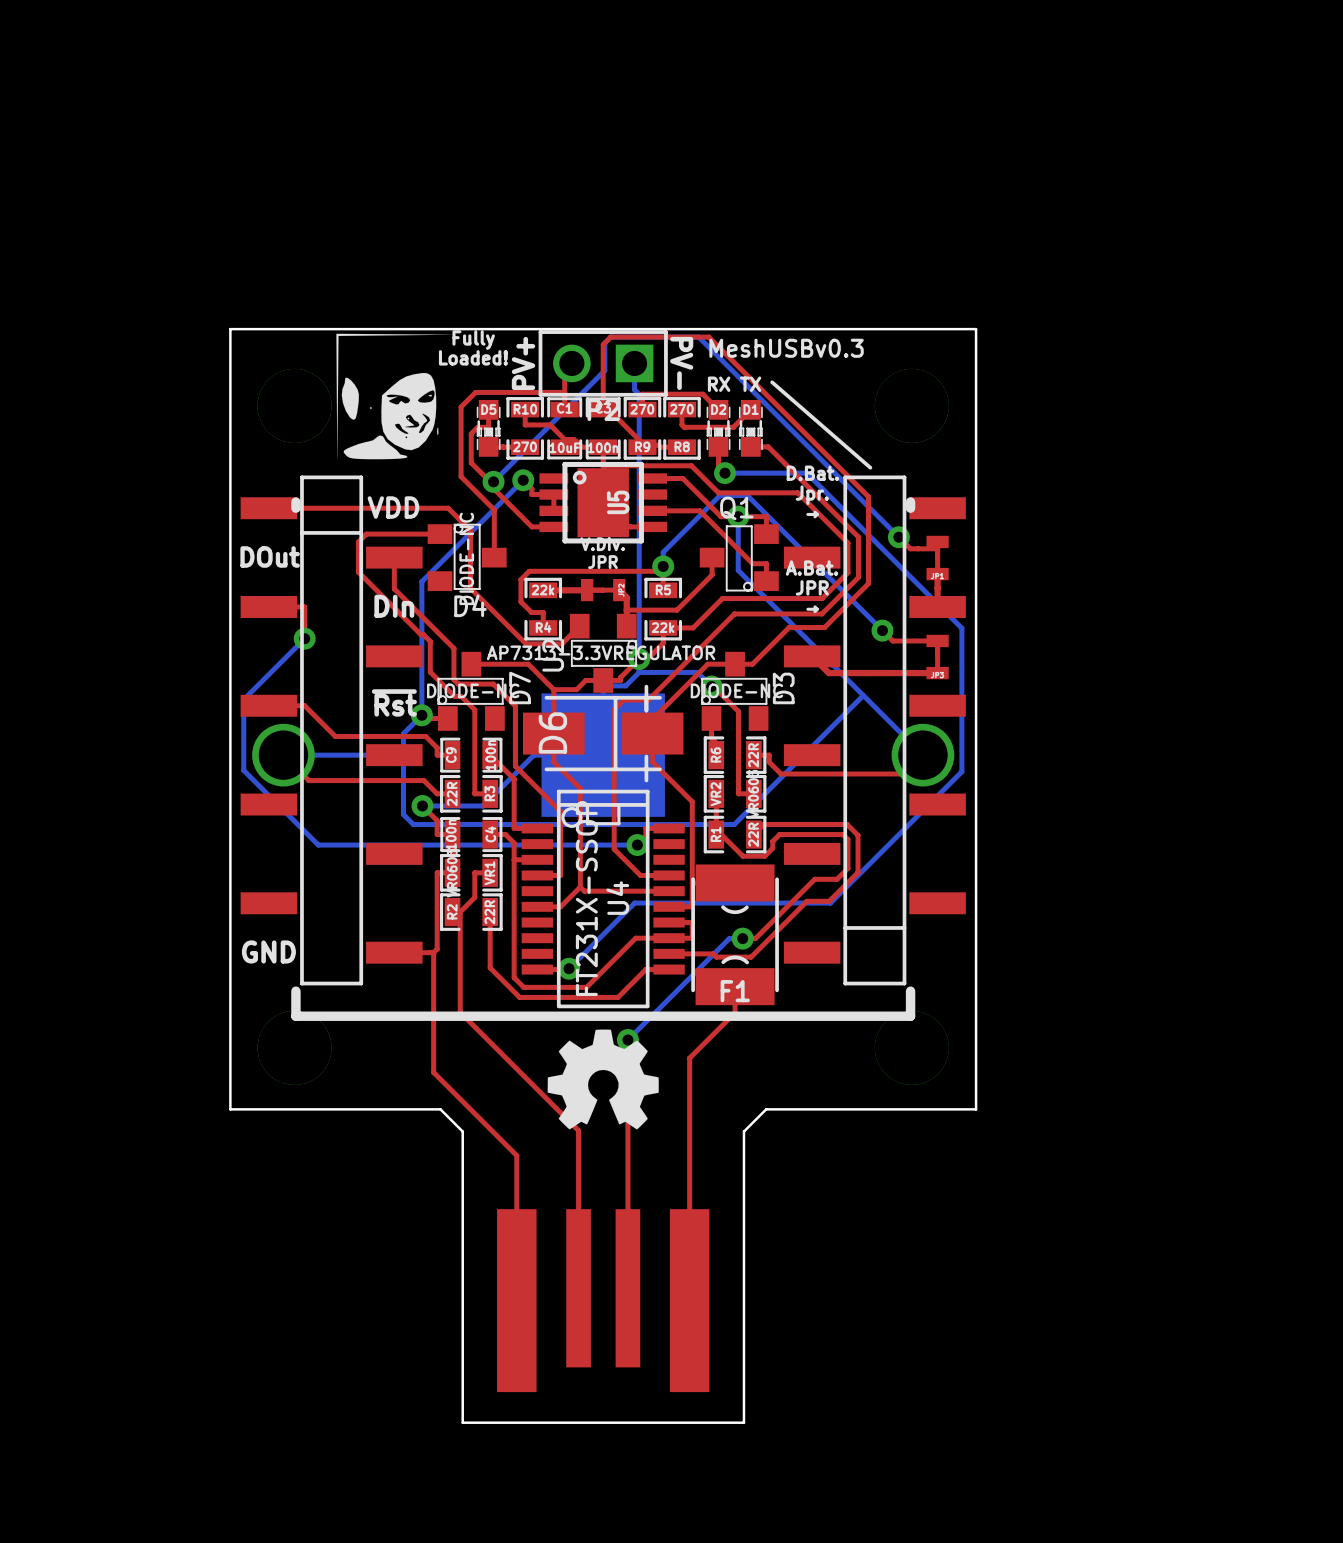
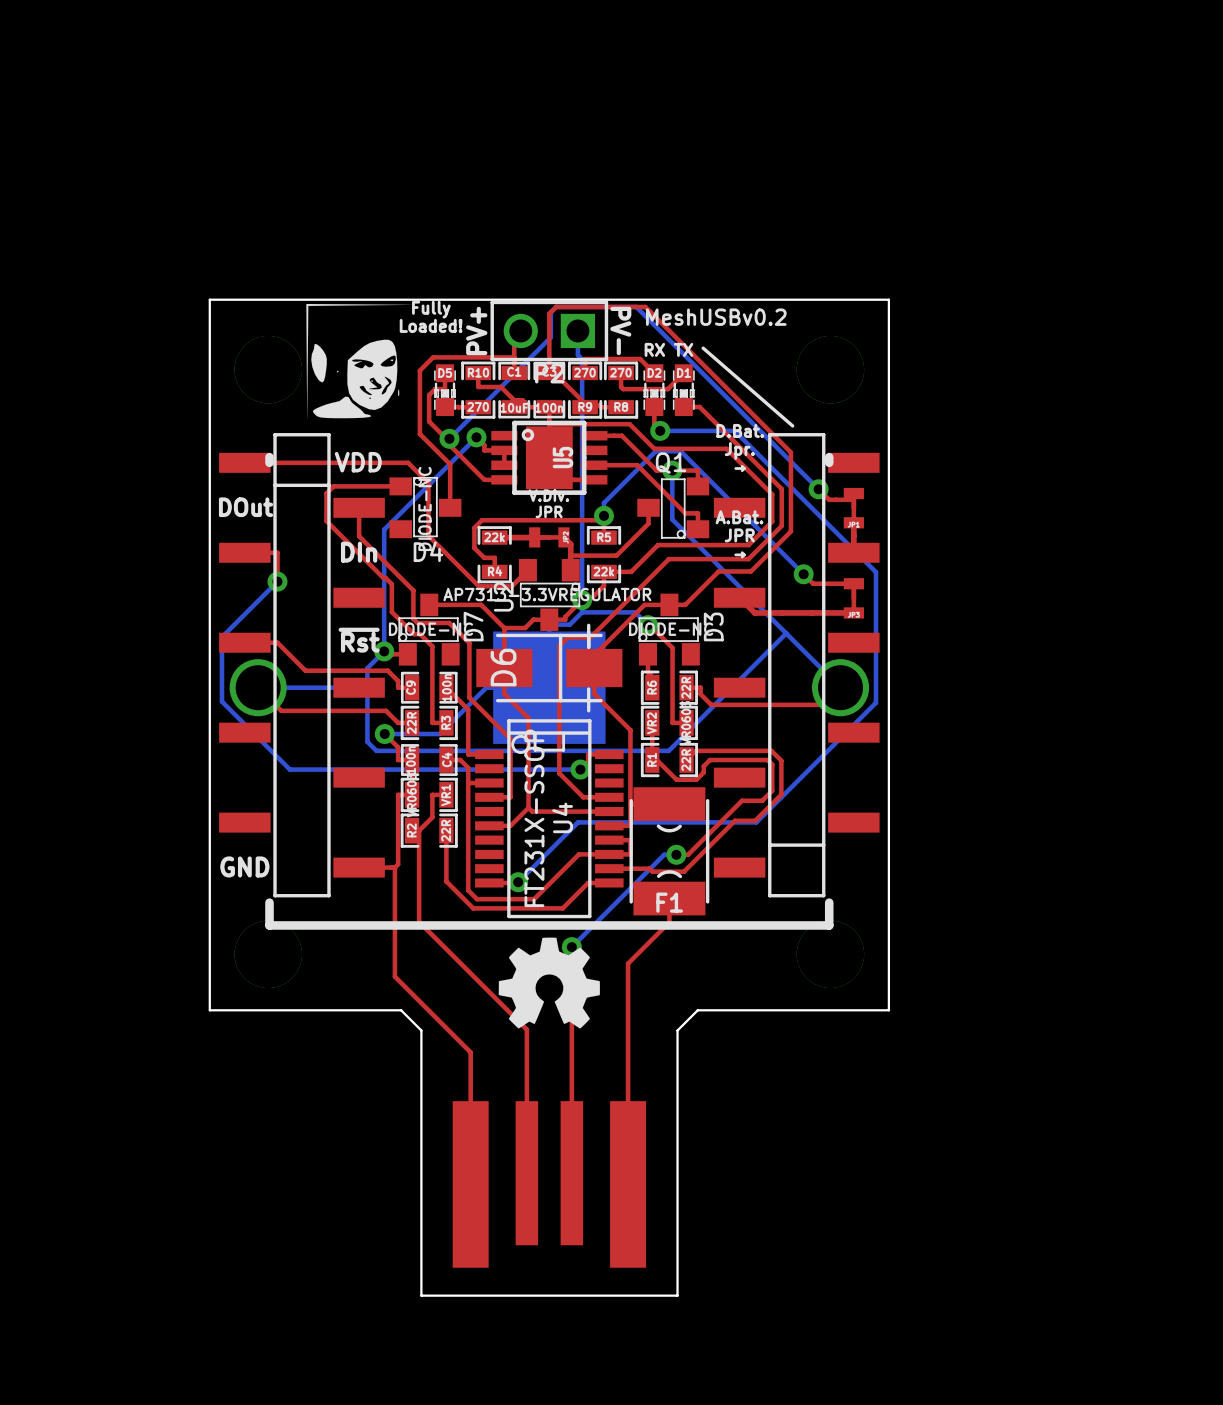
text: MeshUSBv0.3 (786, 348) -> MeshUSBv0.2 (716, 317)

